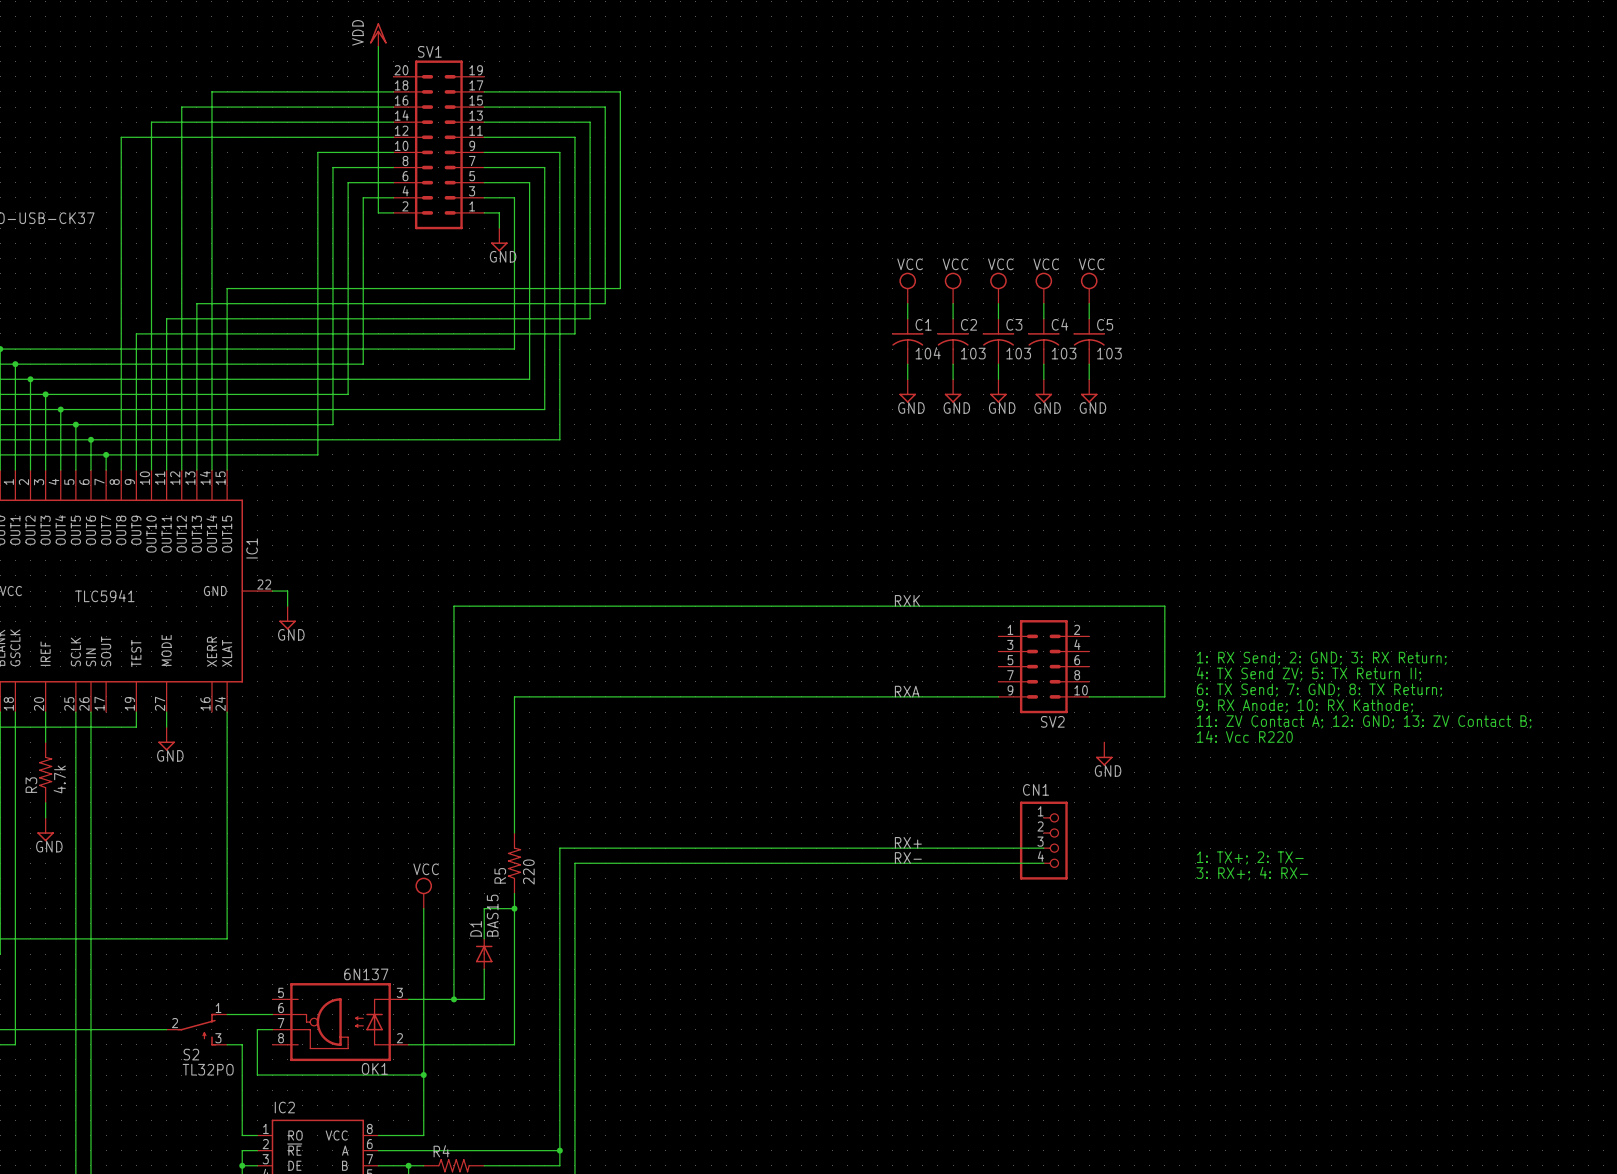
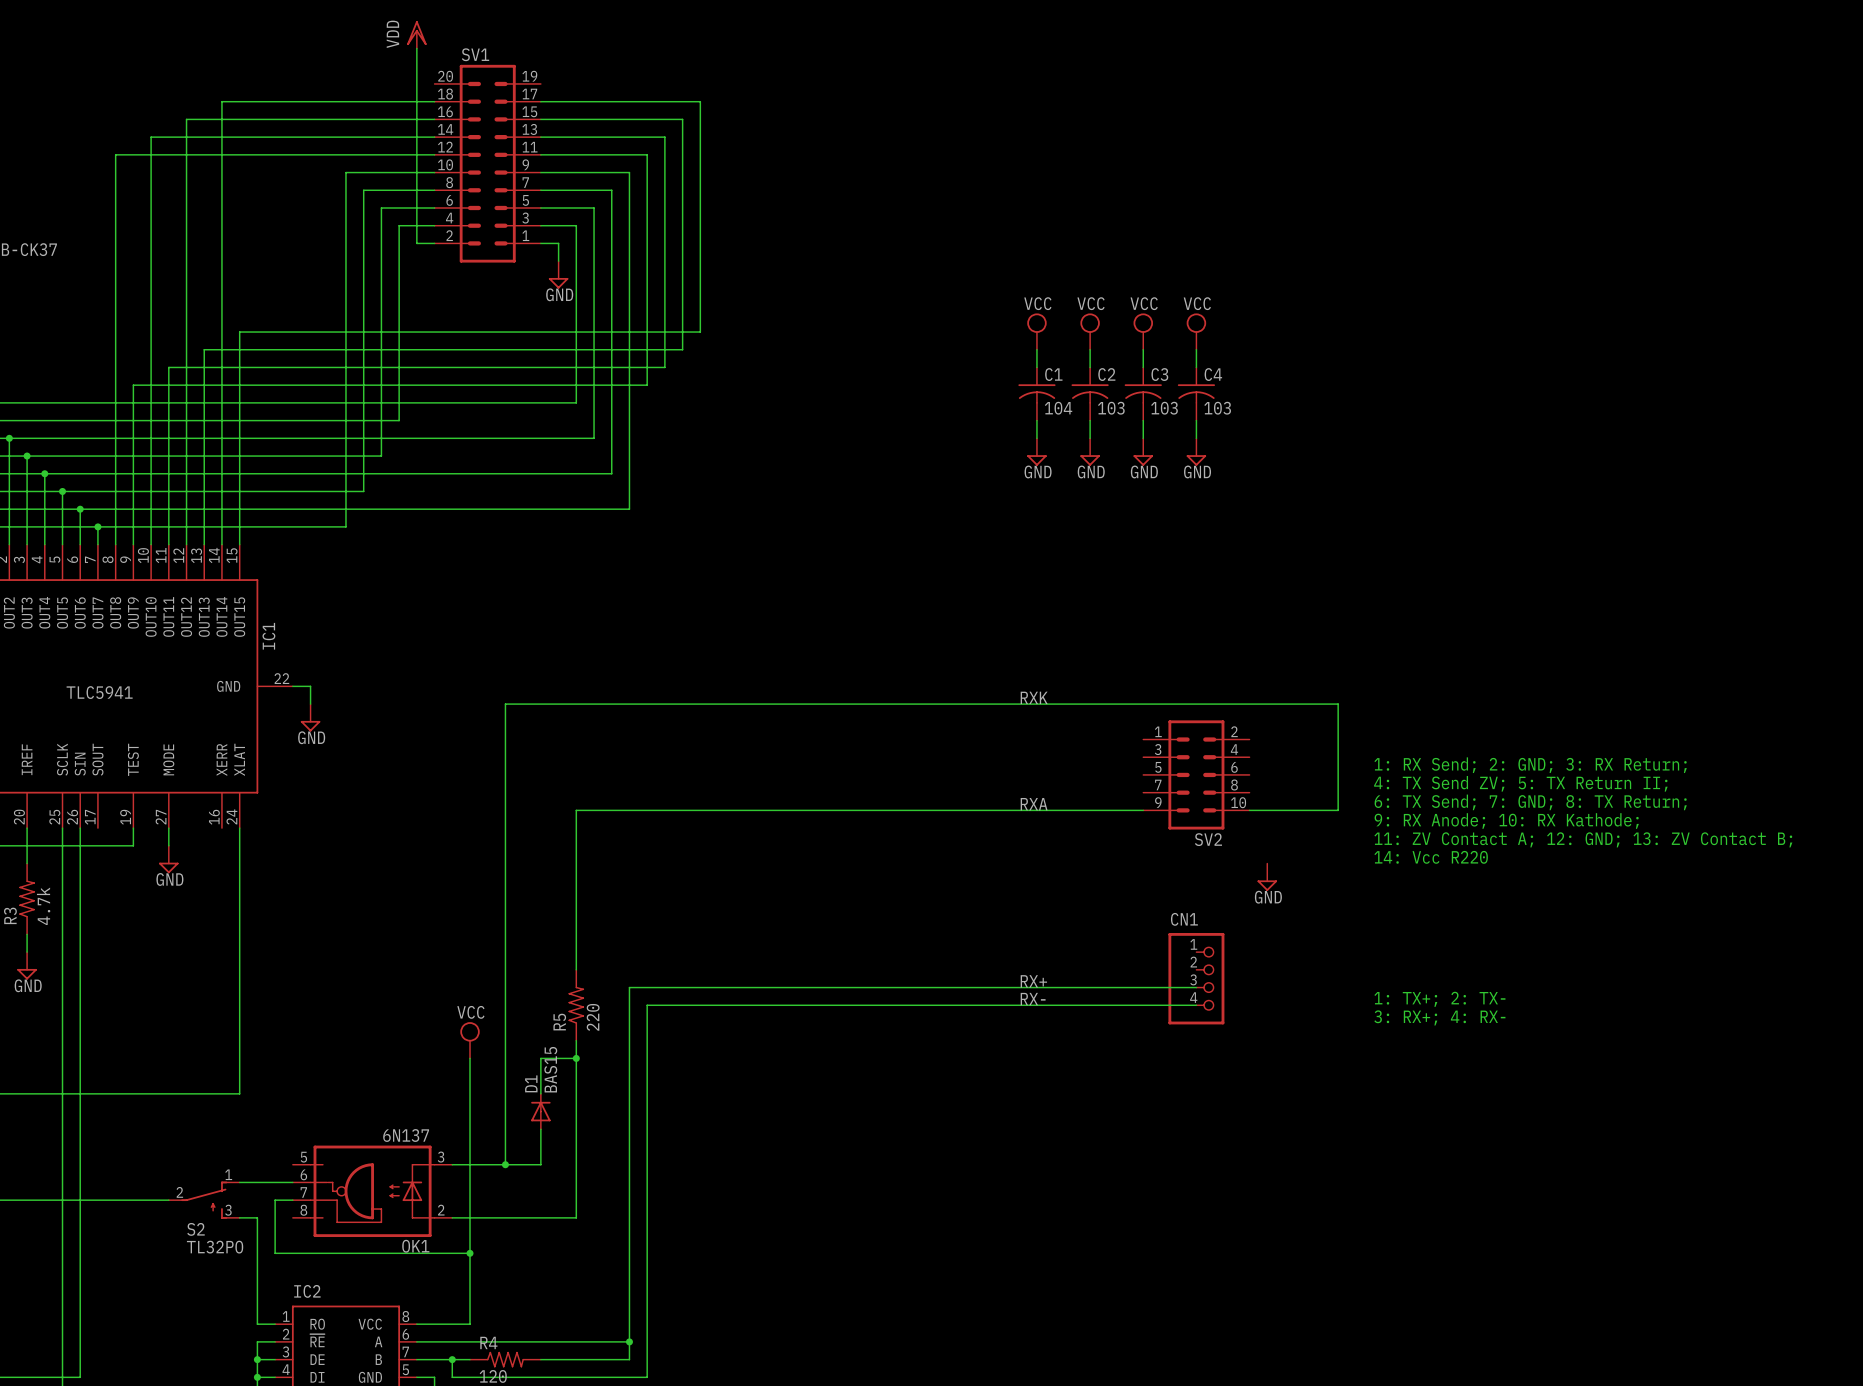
power symbol: VCC (1089, 288) -> none
wire: (1089, 303) (1089, 318) -> none
C5: 103 (1089, 341) -> none
wire: (1089, 364) (1089, 379) -> none
power symbol: GND (1089, 391) -> none

